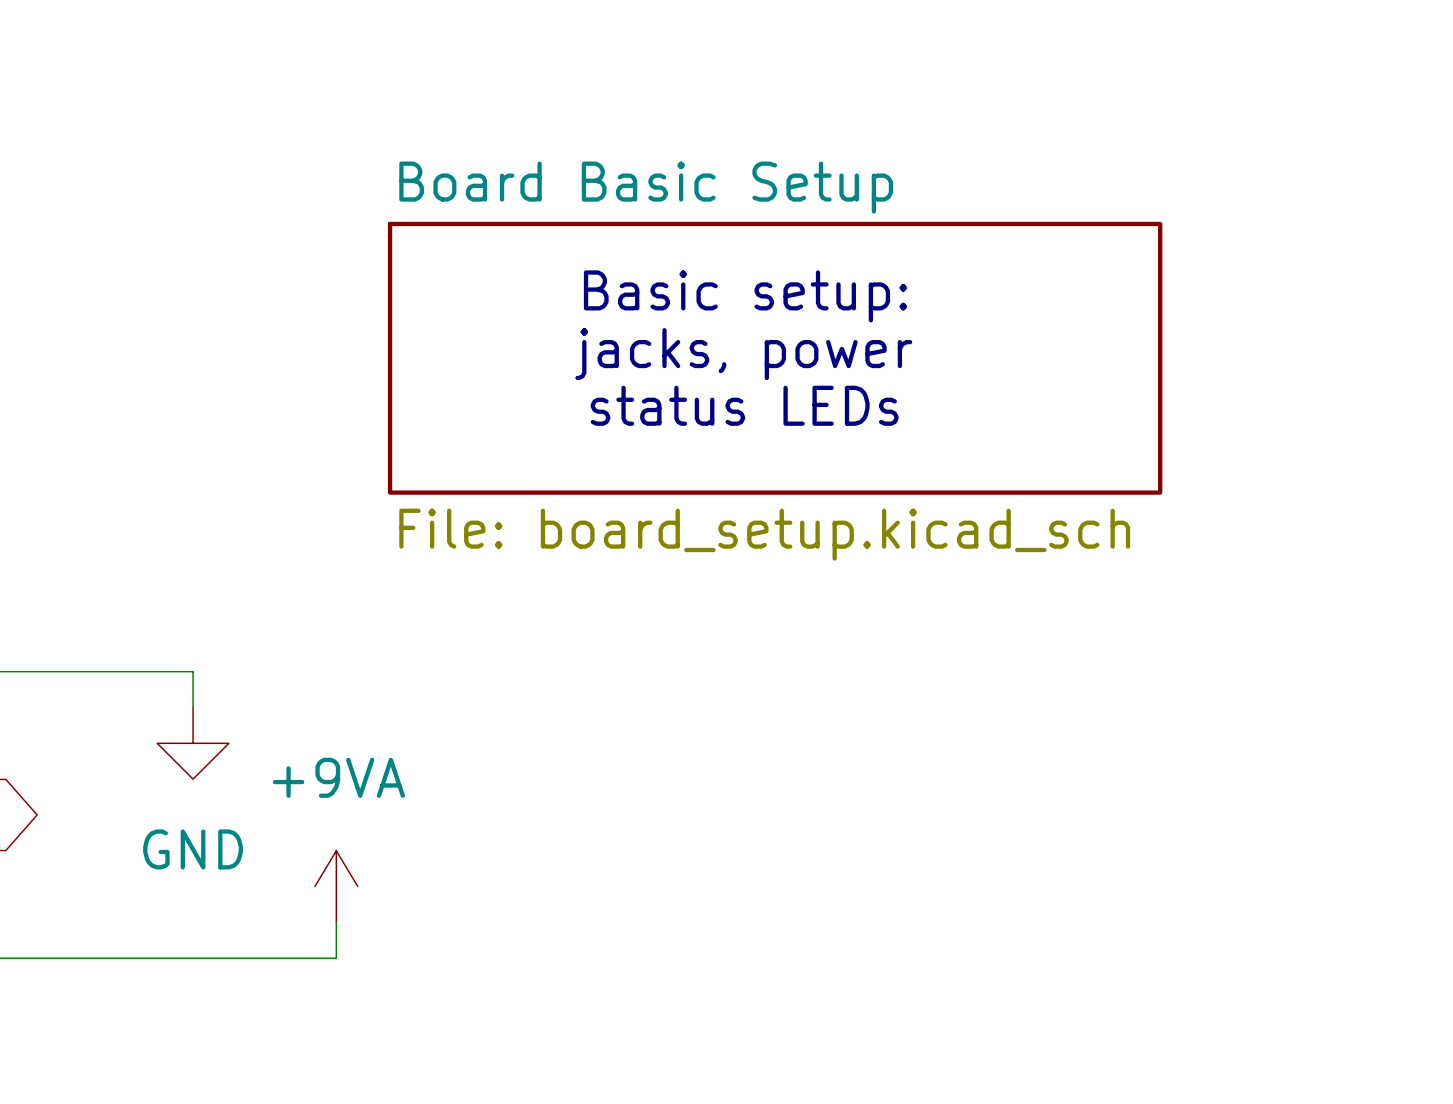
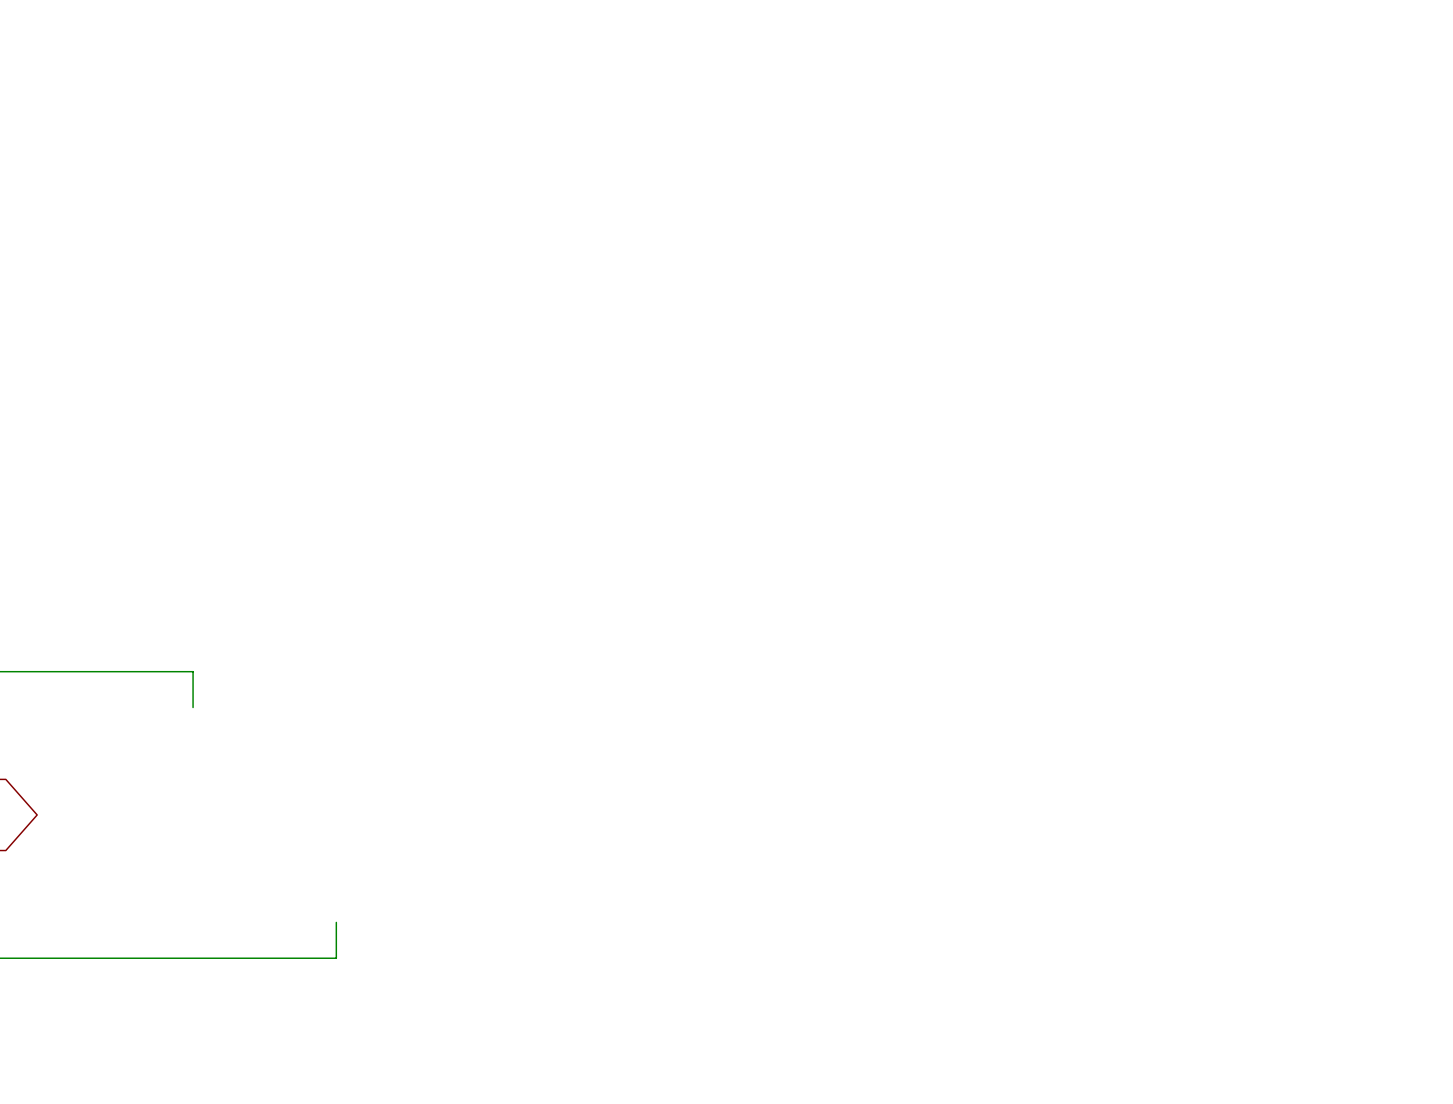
text: Basic setup: (745, 296) -> none
text: jacks, power (743, 354) -> none
sheet Board Basic Setup: File: board_setup.kicad_sch (775, 358) -> none
text: status LEDs (744, 405) -> none
power symbol: GND (193, 743) -> none
power symbol: +9VA (336, 886) -> none

